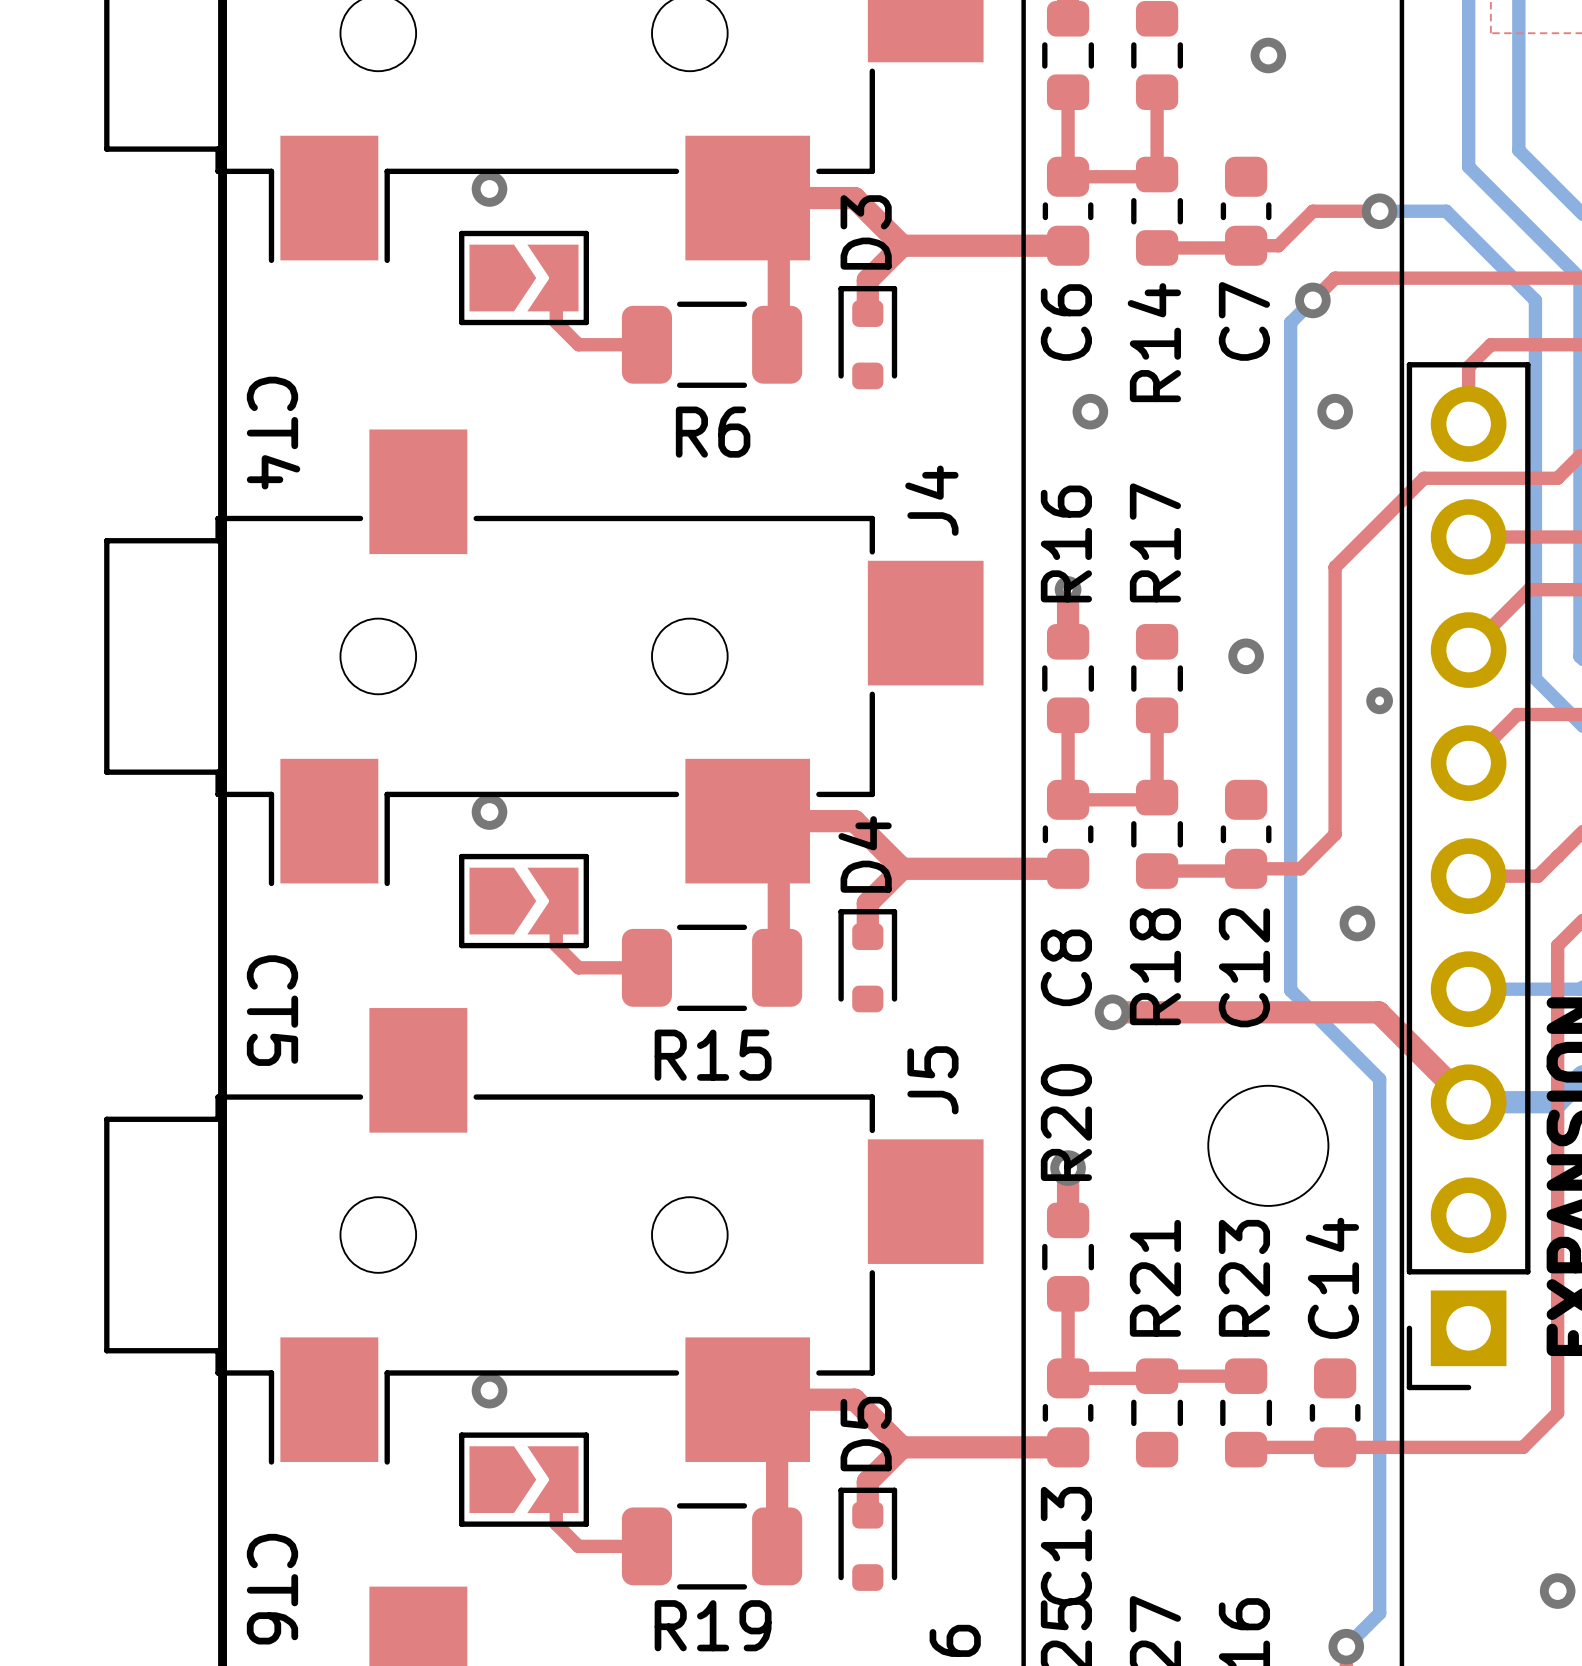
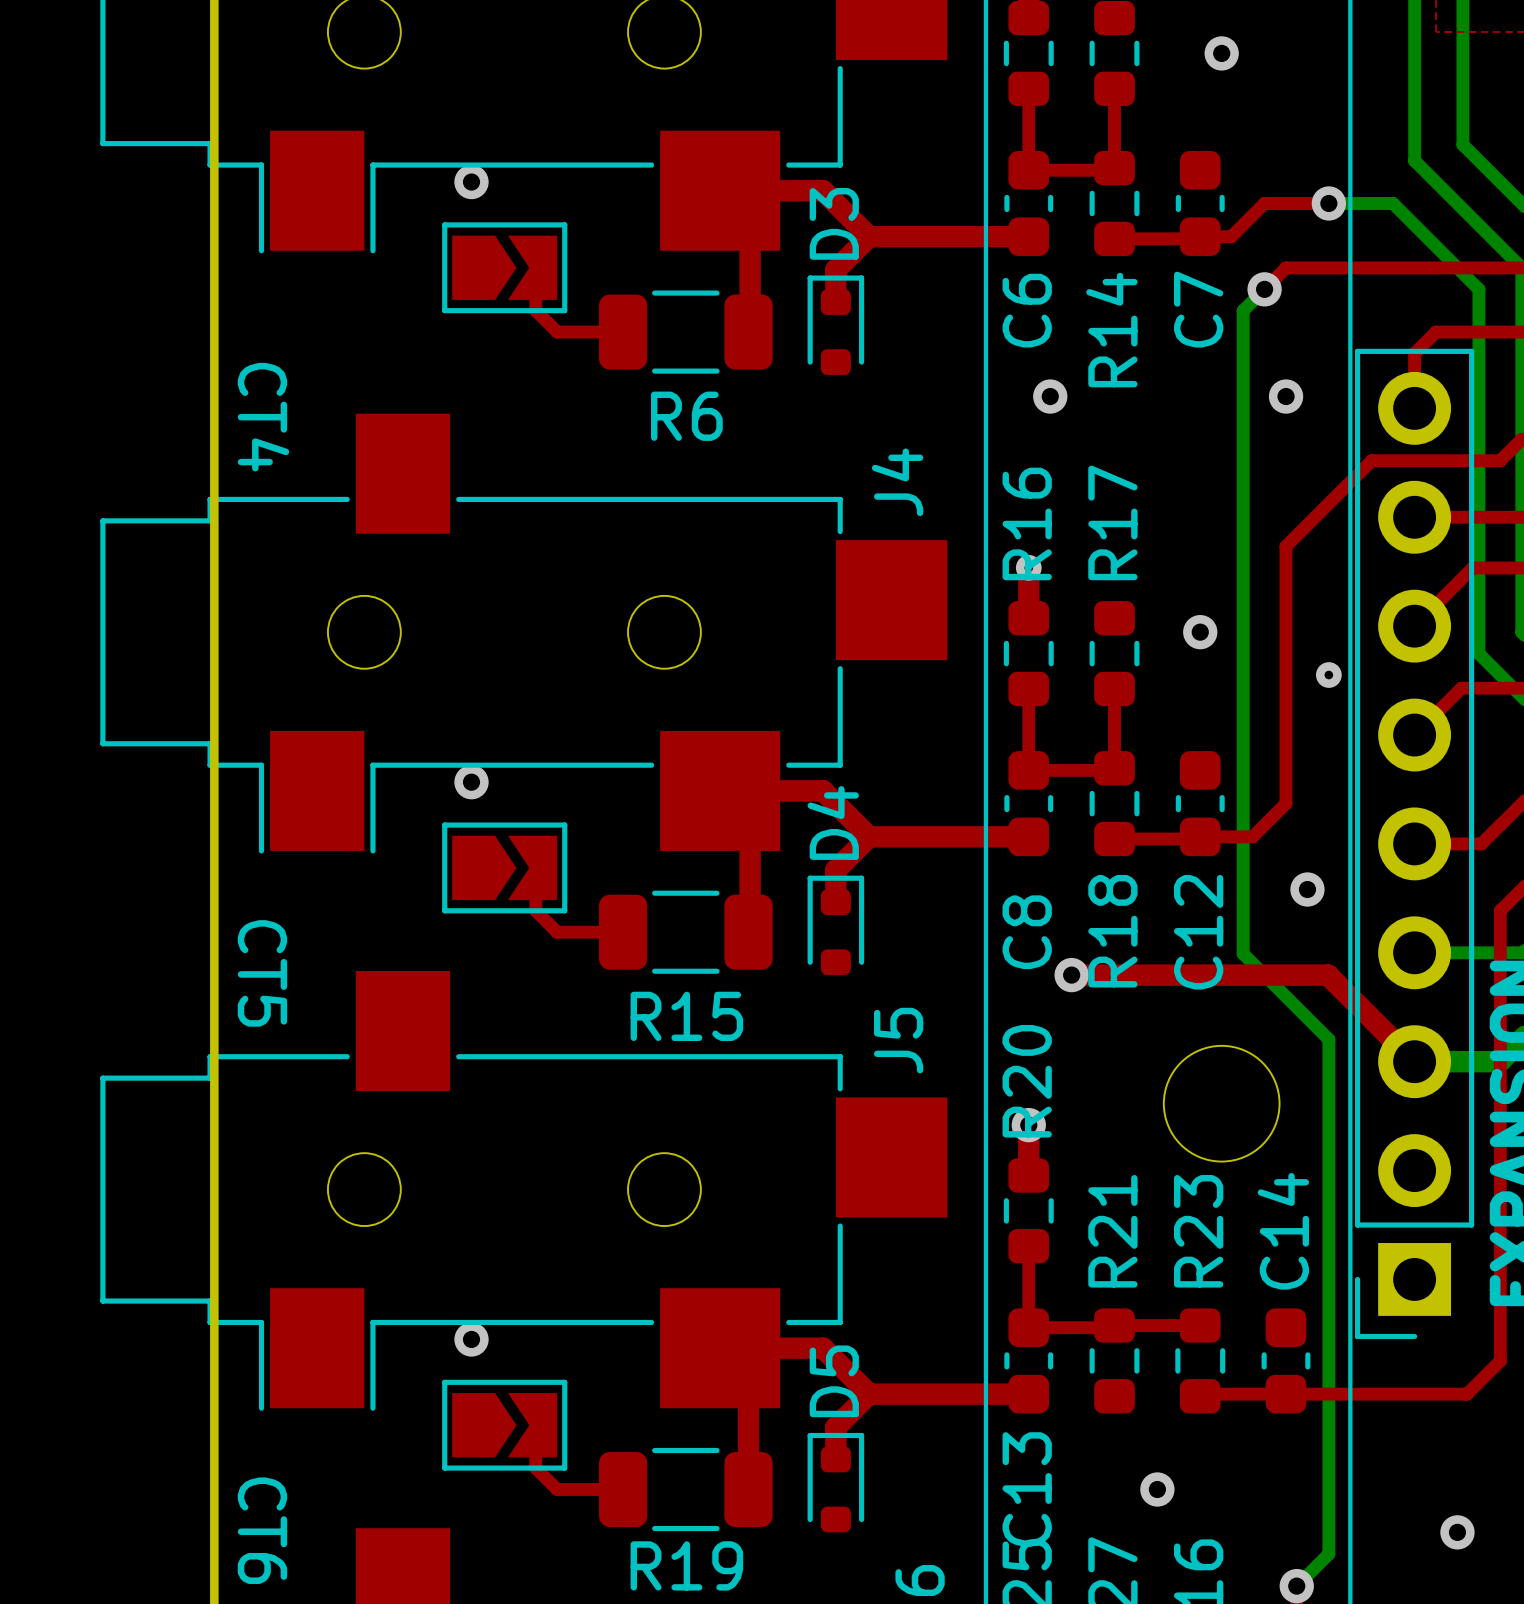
via: none -> (1157, 1489)
via position: (1557, 1591) -> (1457, 1532)

